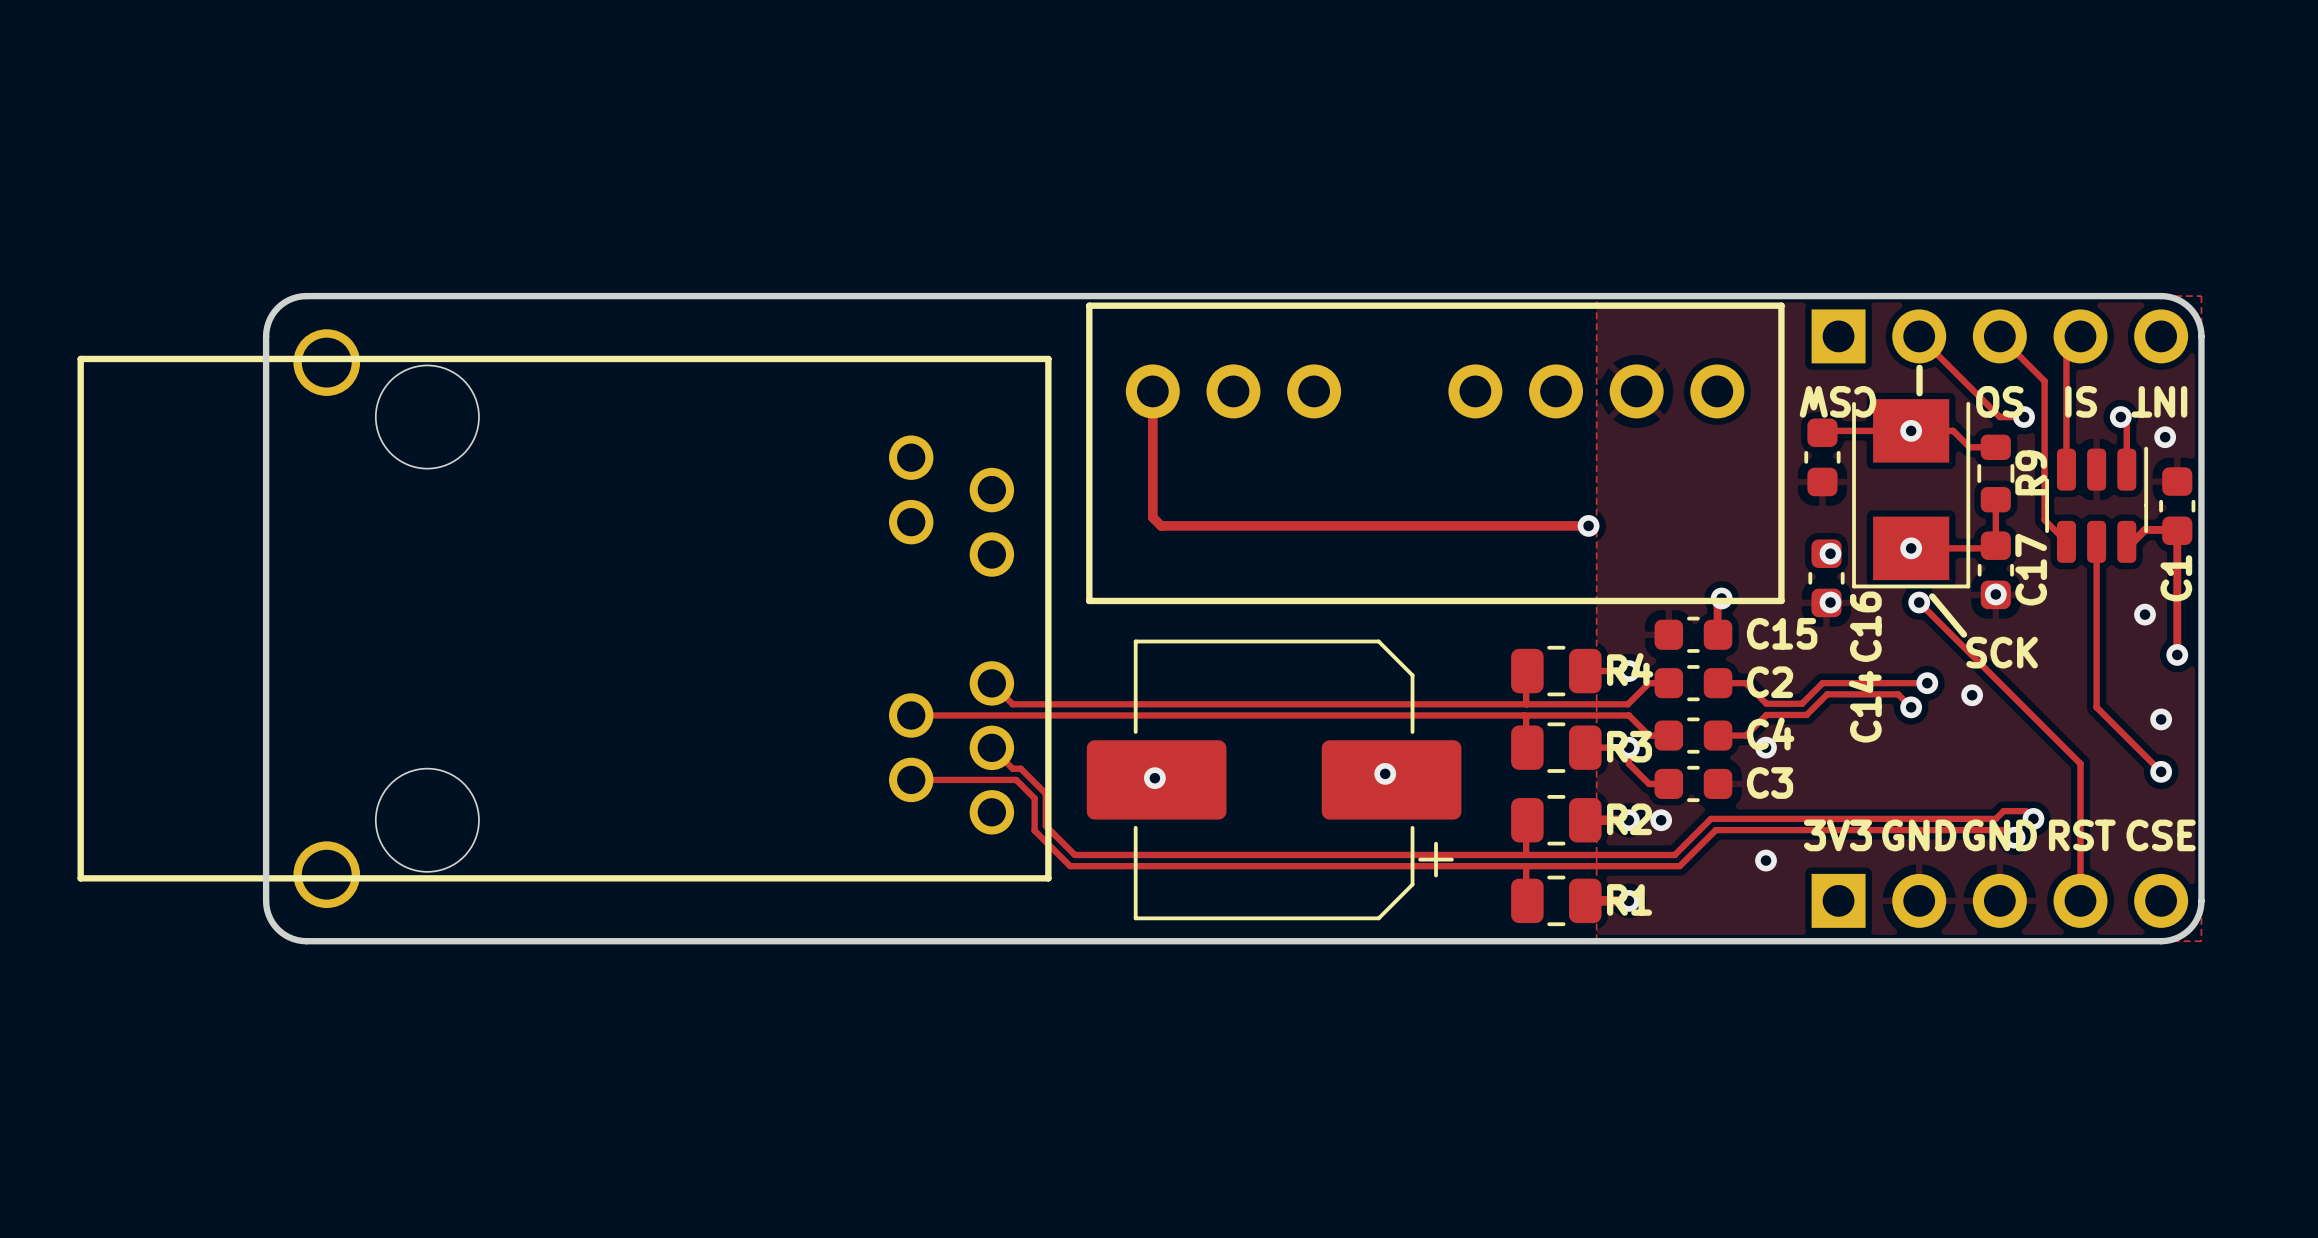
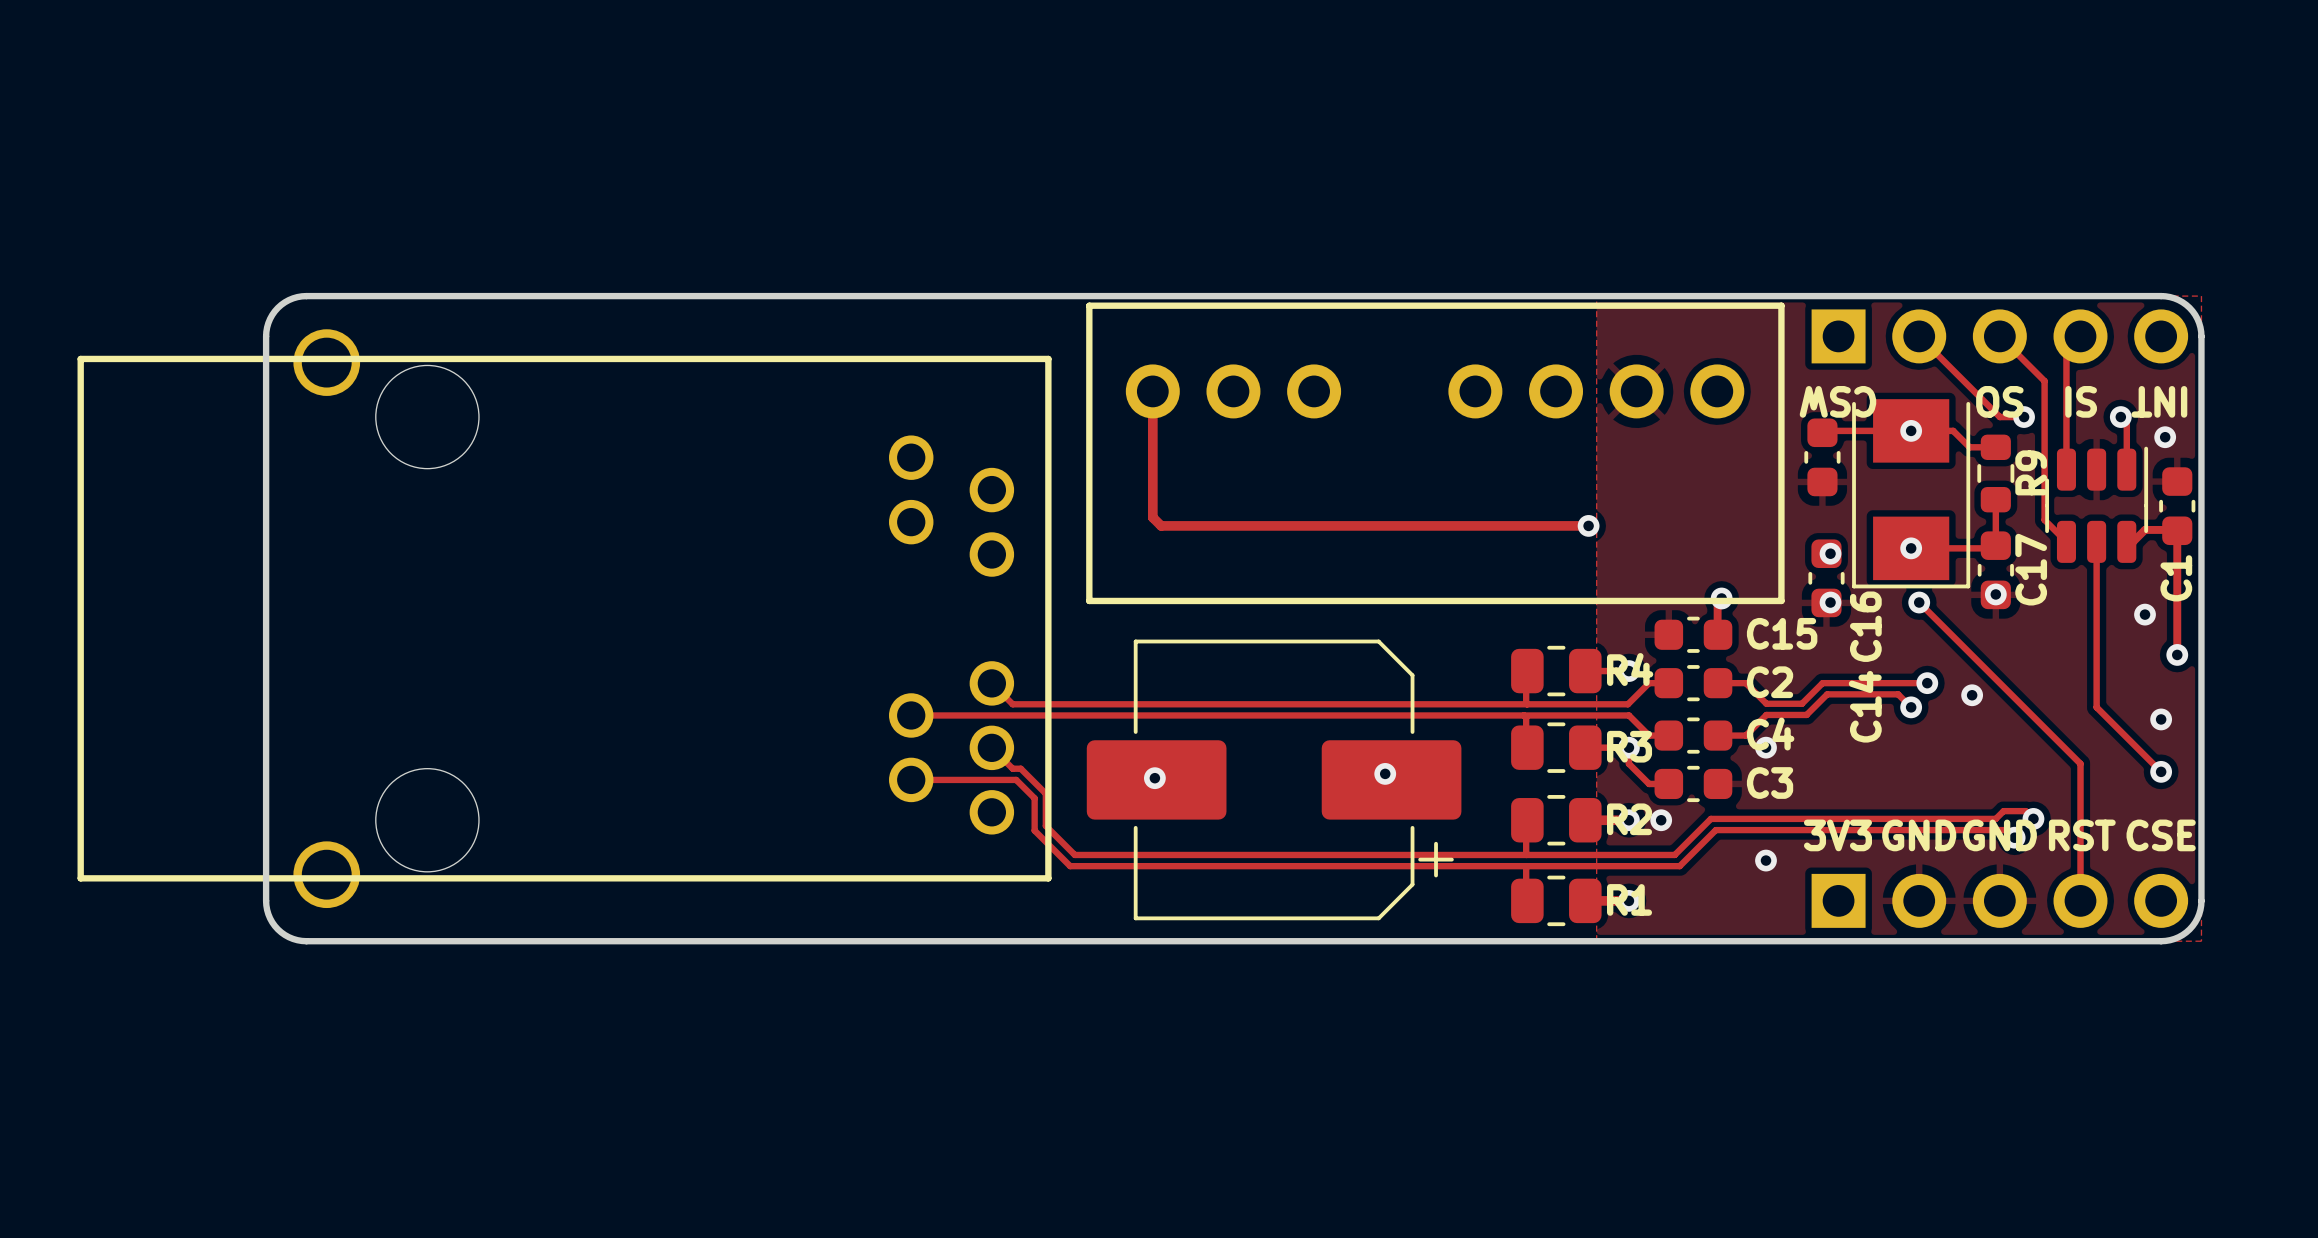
line: (1919, 367) (1919, 393) -> none
line: (1932, 596) (1963, 634) -> none
text: SCK (2002, 652) -> none

